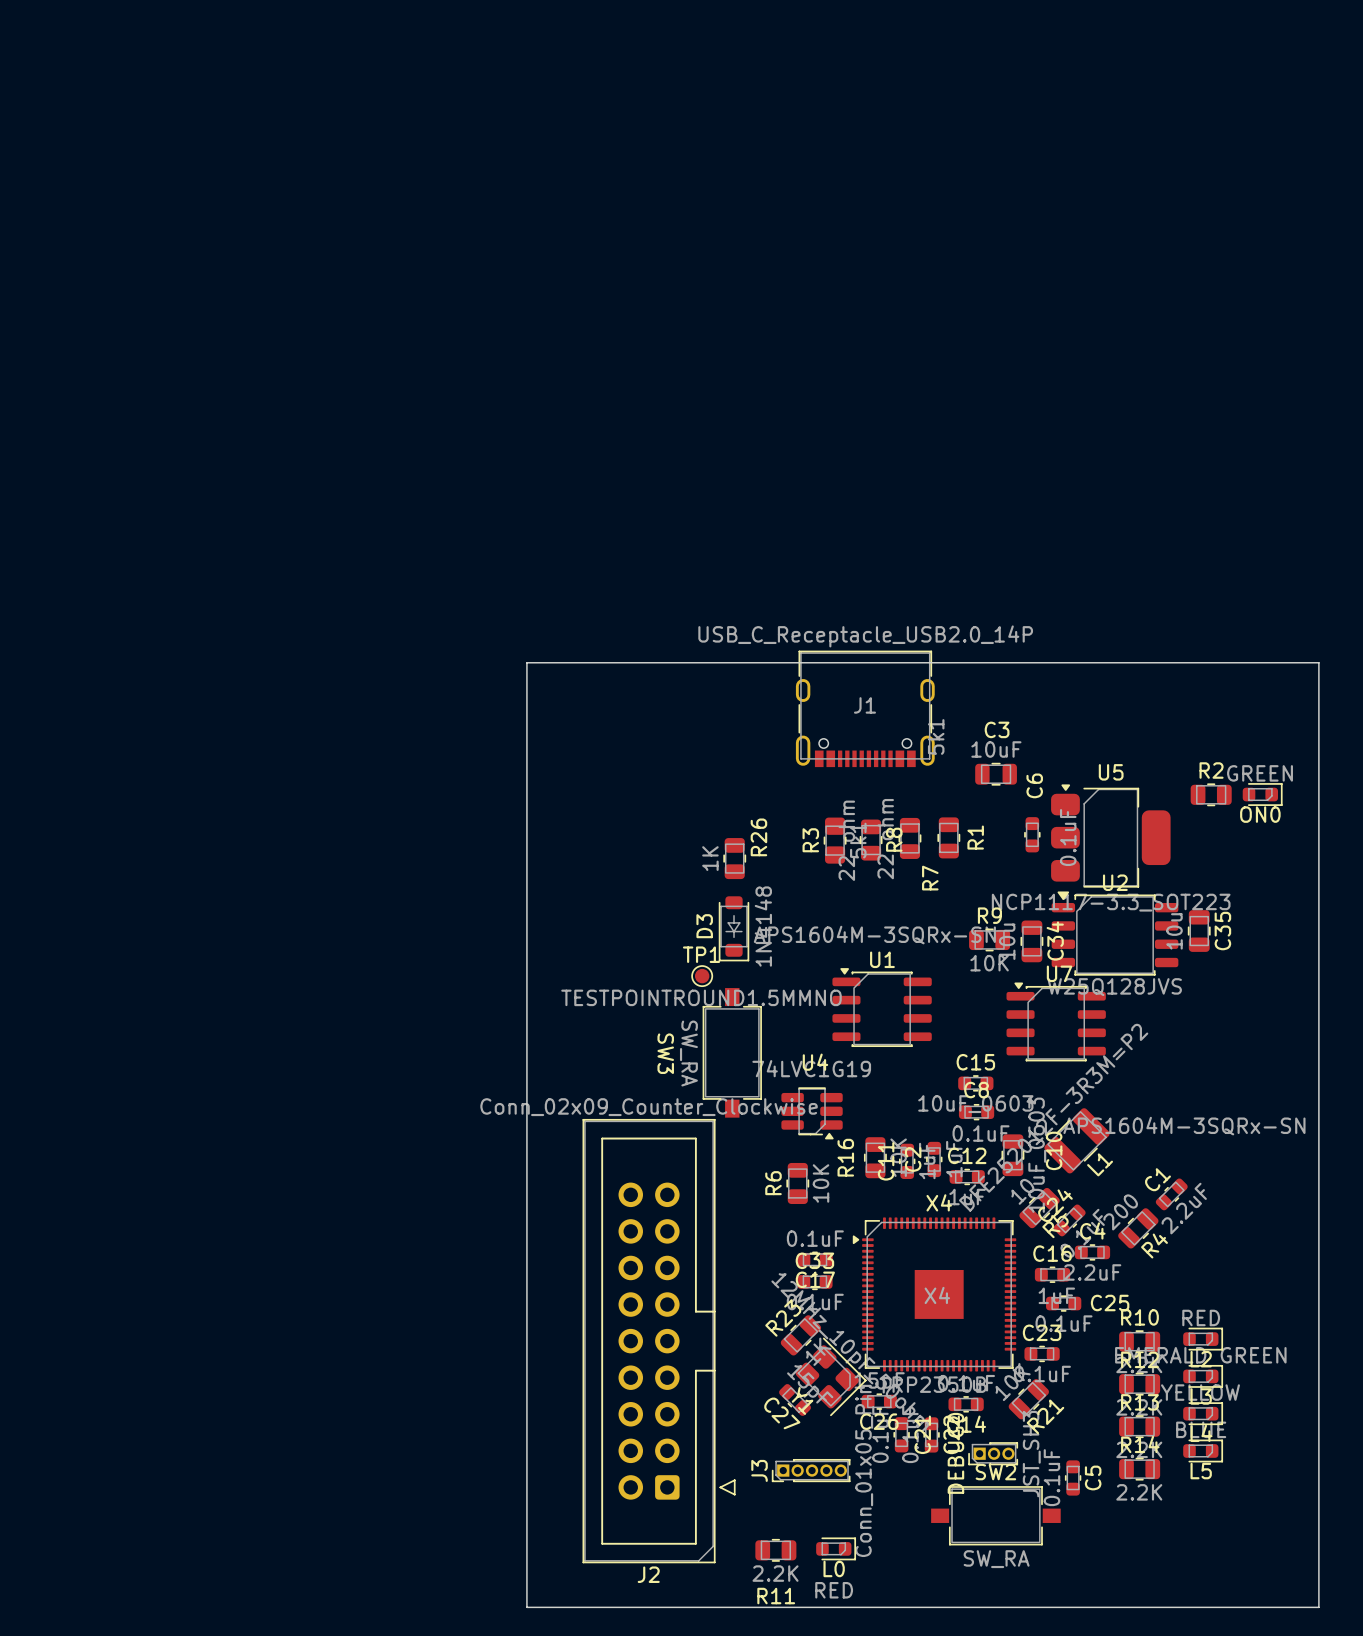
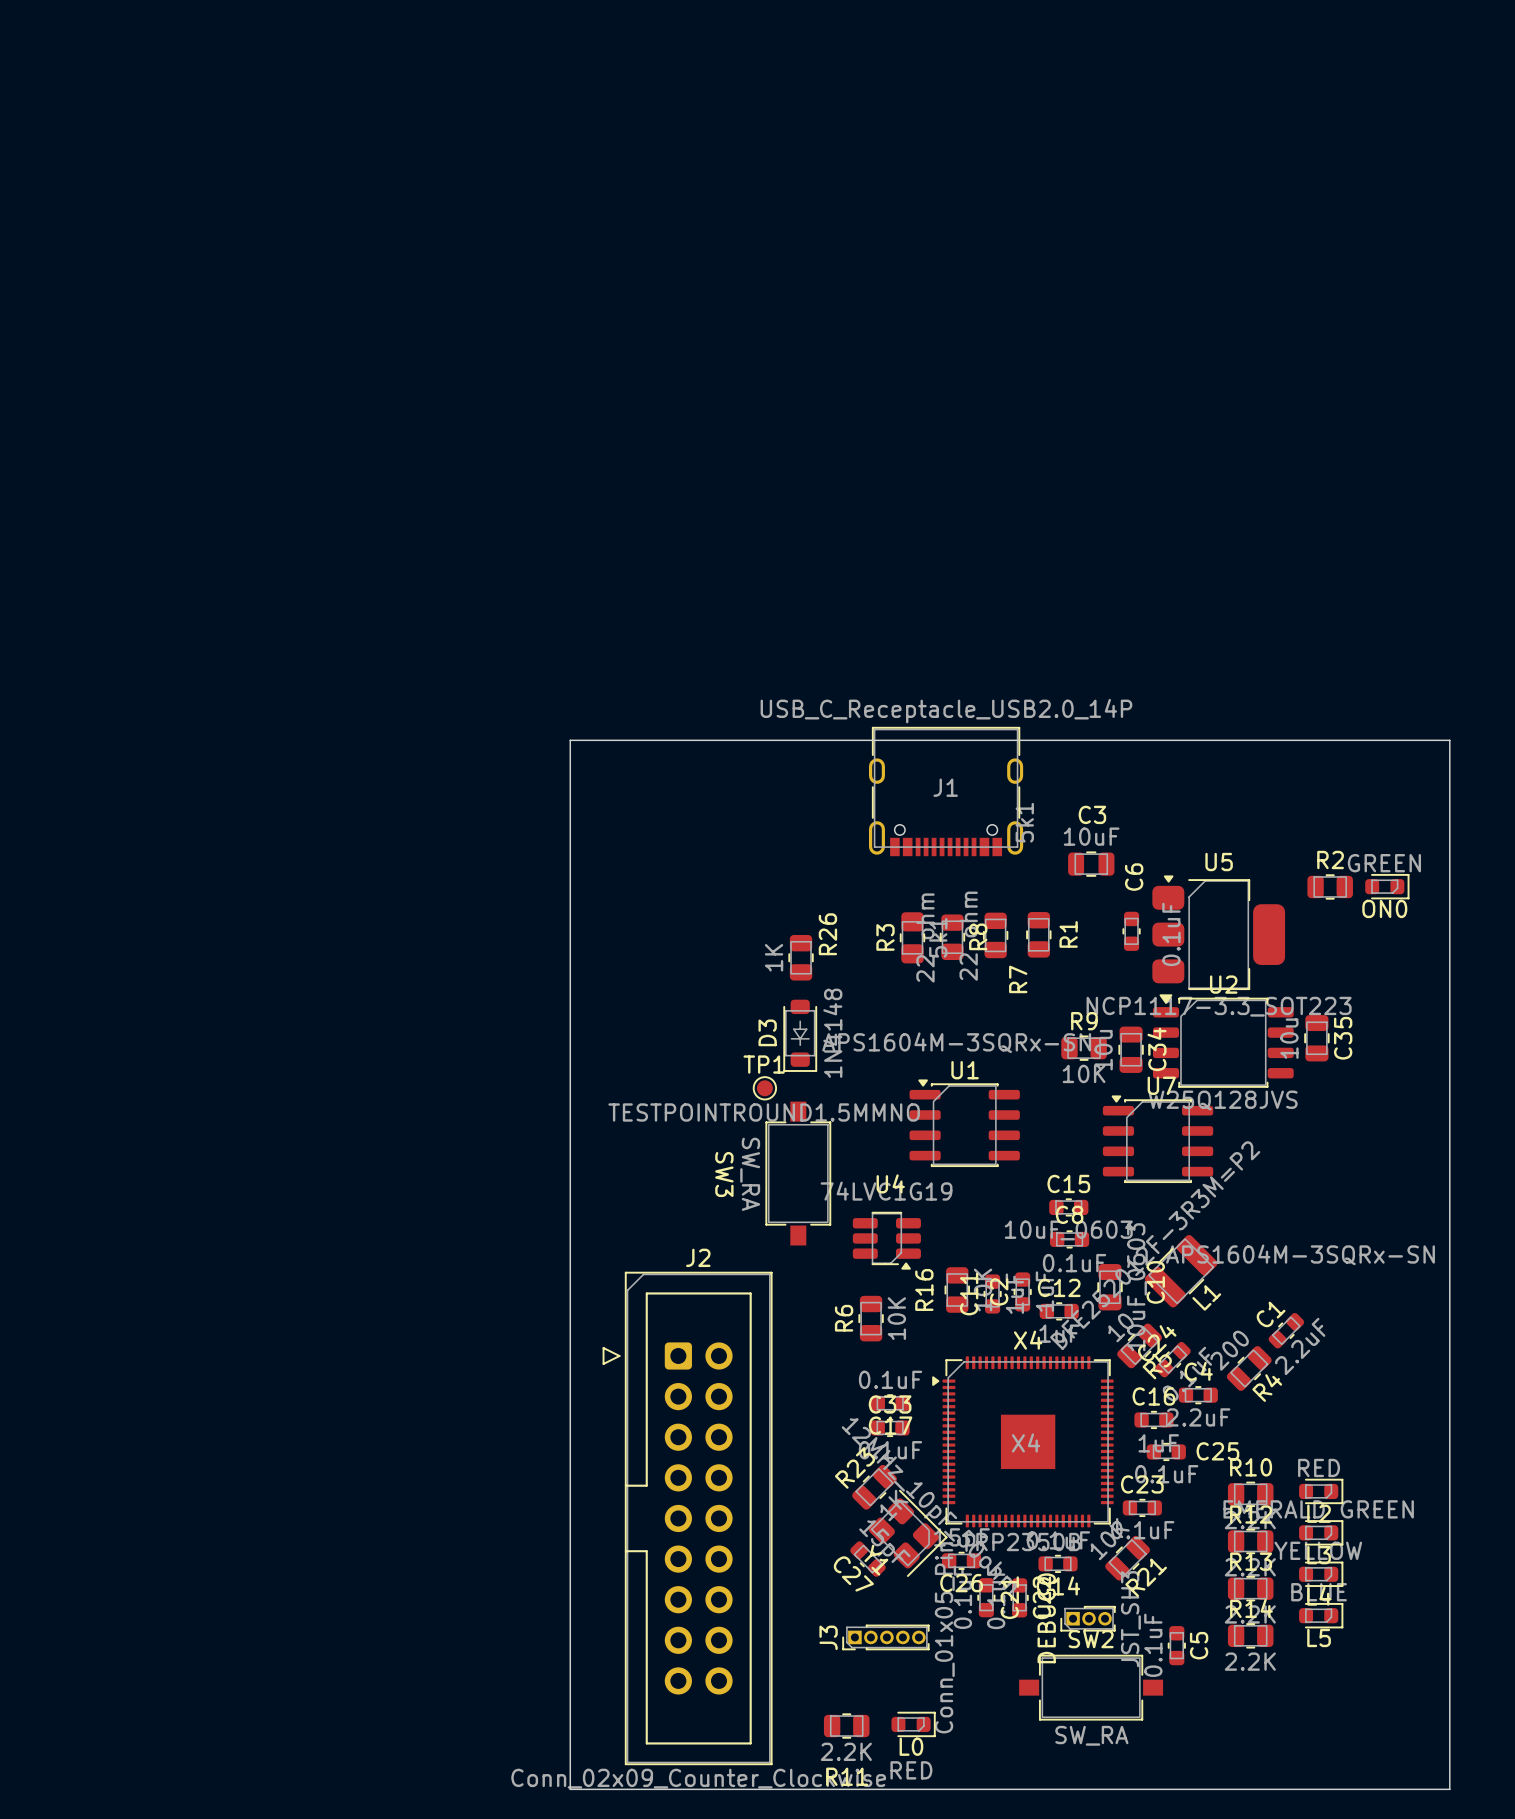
J2 rotation: 0° (659, 1341) -> 180° (687, 1518)

